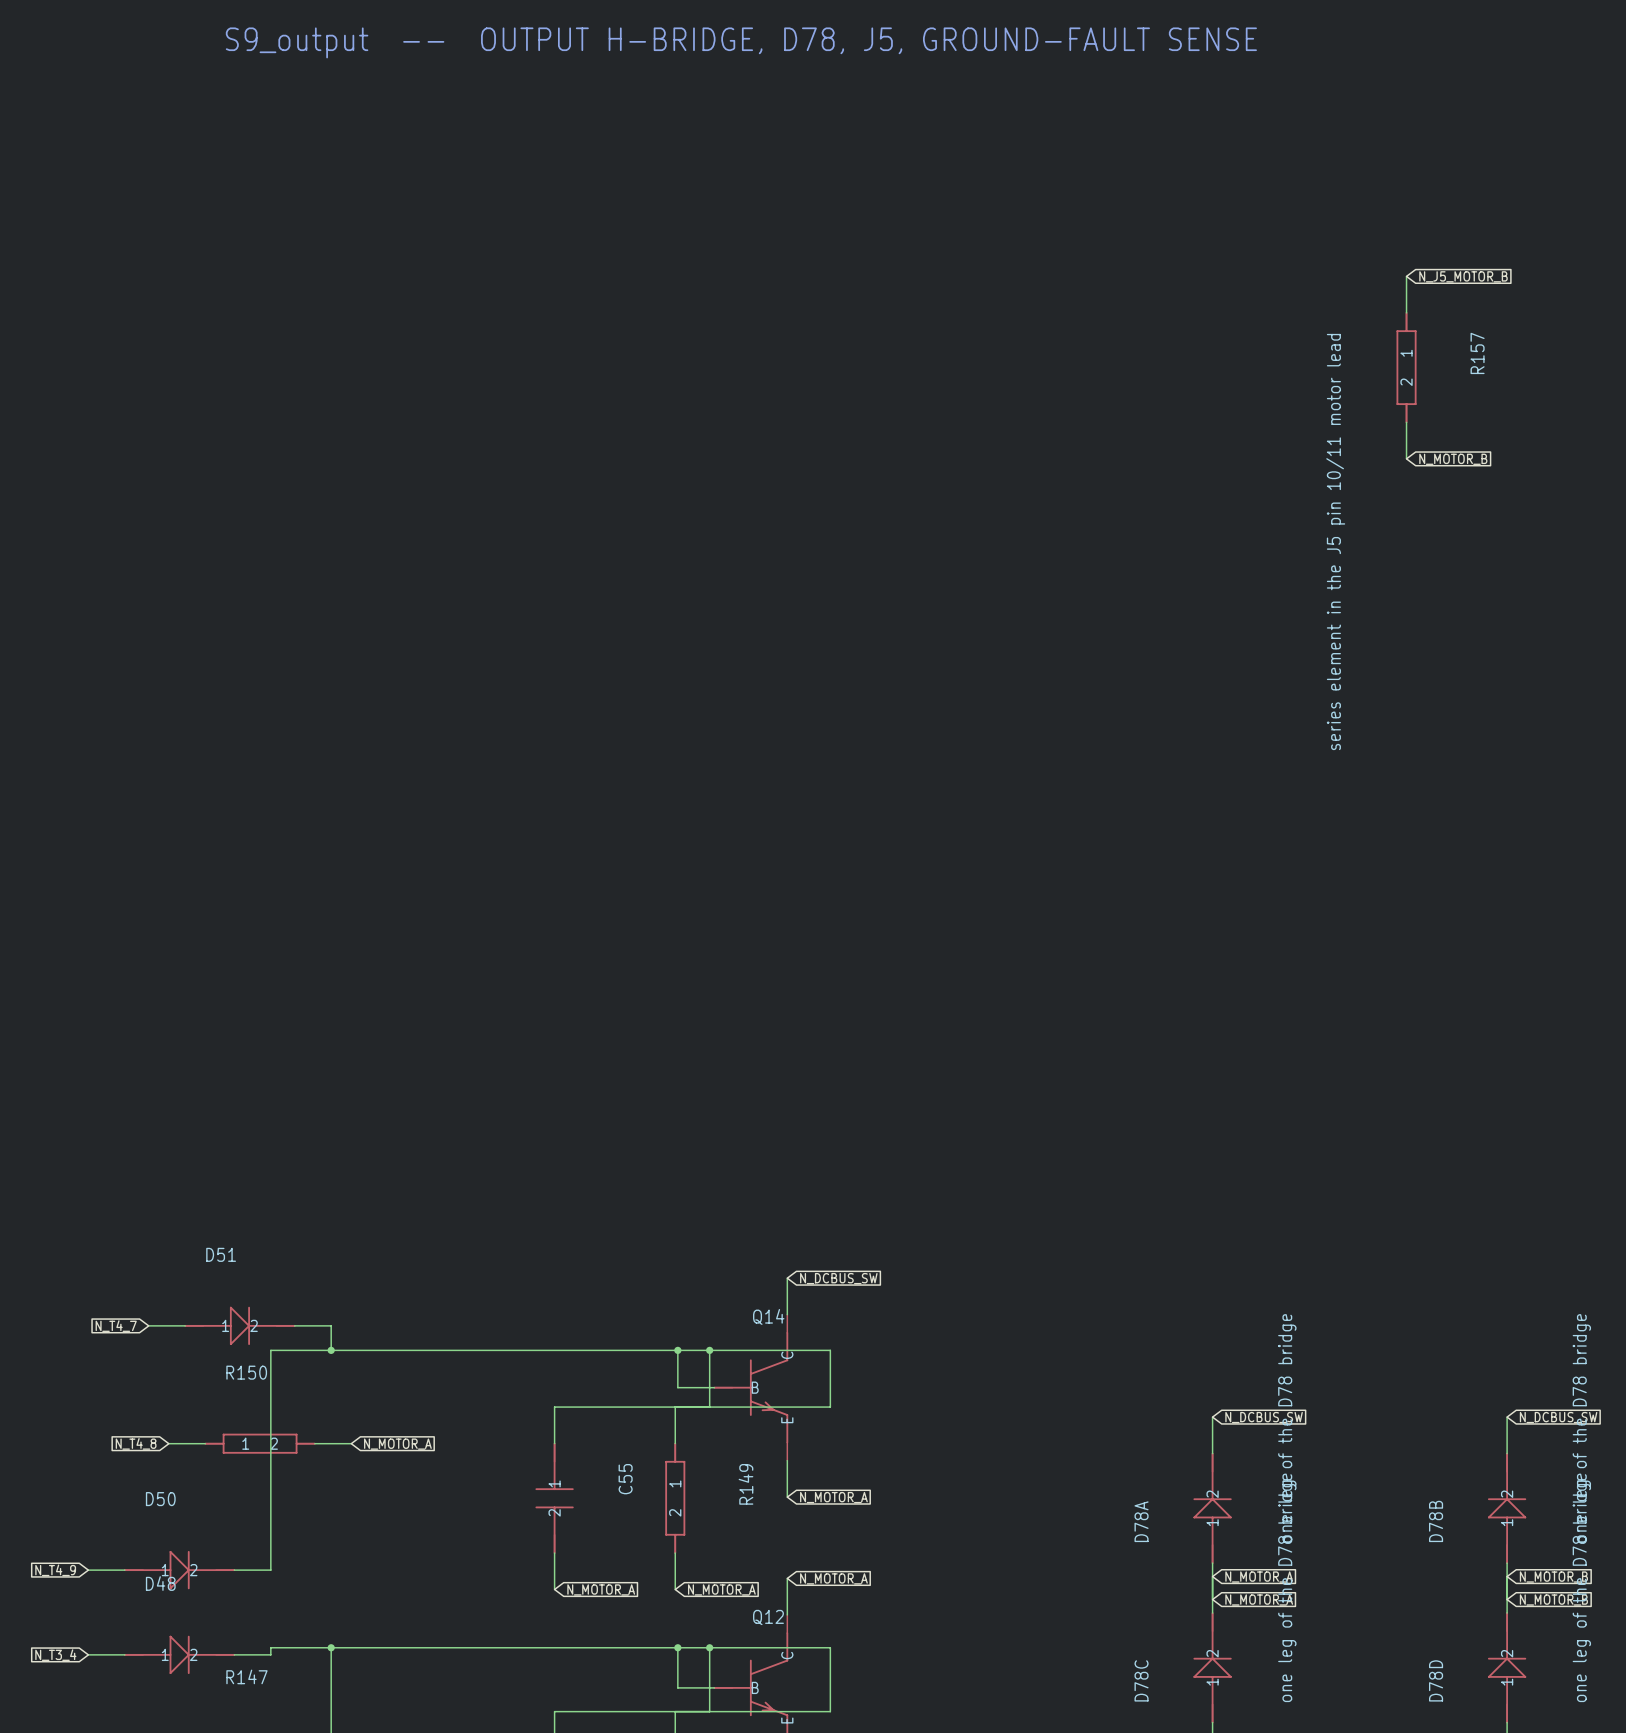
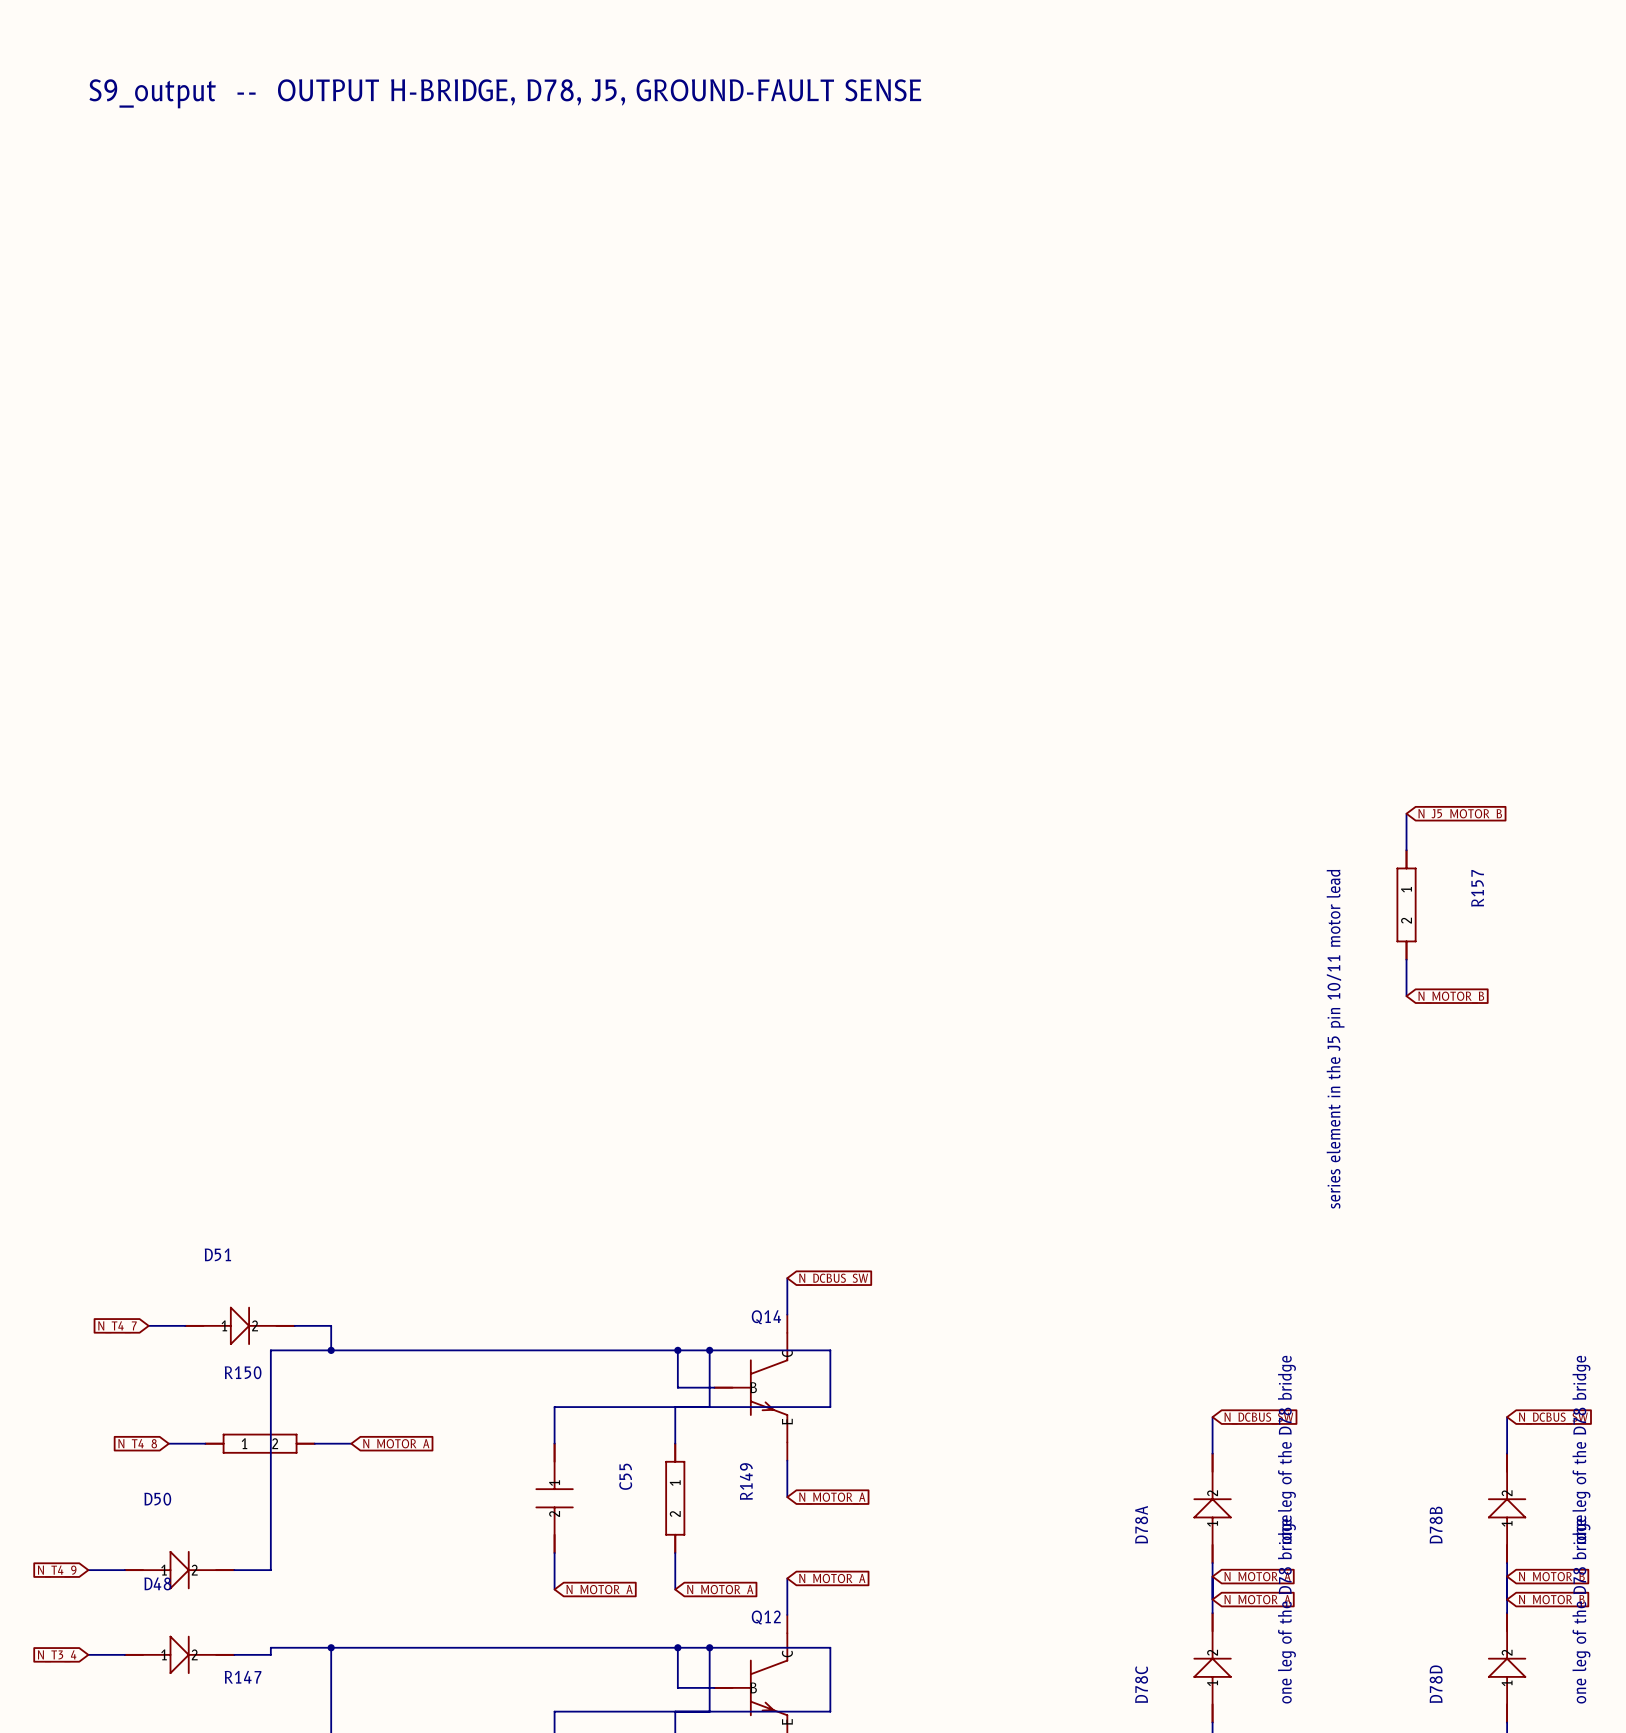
text position: S9_output -- OUTPUT H-BRIDGE, D78, J5, GROUND-FAULT SENSE (741, 42) -> S9_output -- OUTPUT H-BRIDGE, D78, J5, GROUND-FAULT SENSE (505, 93)
wire: (1406, 276) (1406, 312) -> none
global label: N_J5_MOTOR_B (1463, 276) -> none
R157 position: (1406, 367) -> (1406, 904)
wire: (1406, 422) (1406, 458) -> none
global label: N_MOTOR_B (1453, 459) -> none
wire: none -> (1406, 813) (1406, 850)
global label: none -> N_J5_MOTOR_B (1460, 815)
wire: none -> (1406, 959) (1406, 996)
global label: none -> N_MOTOR_B (1451, 997)

